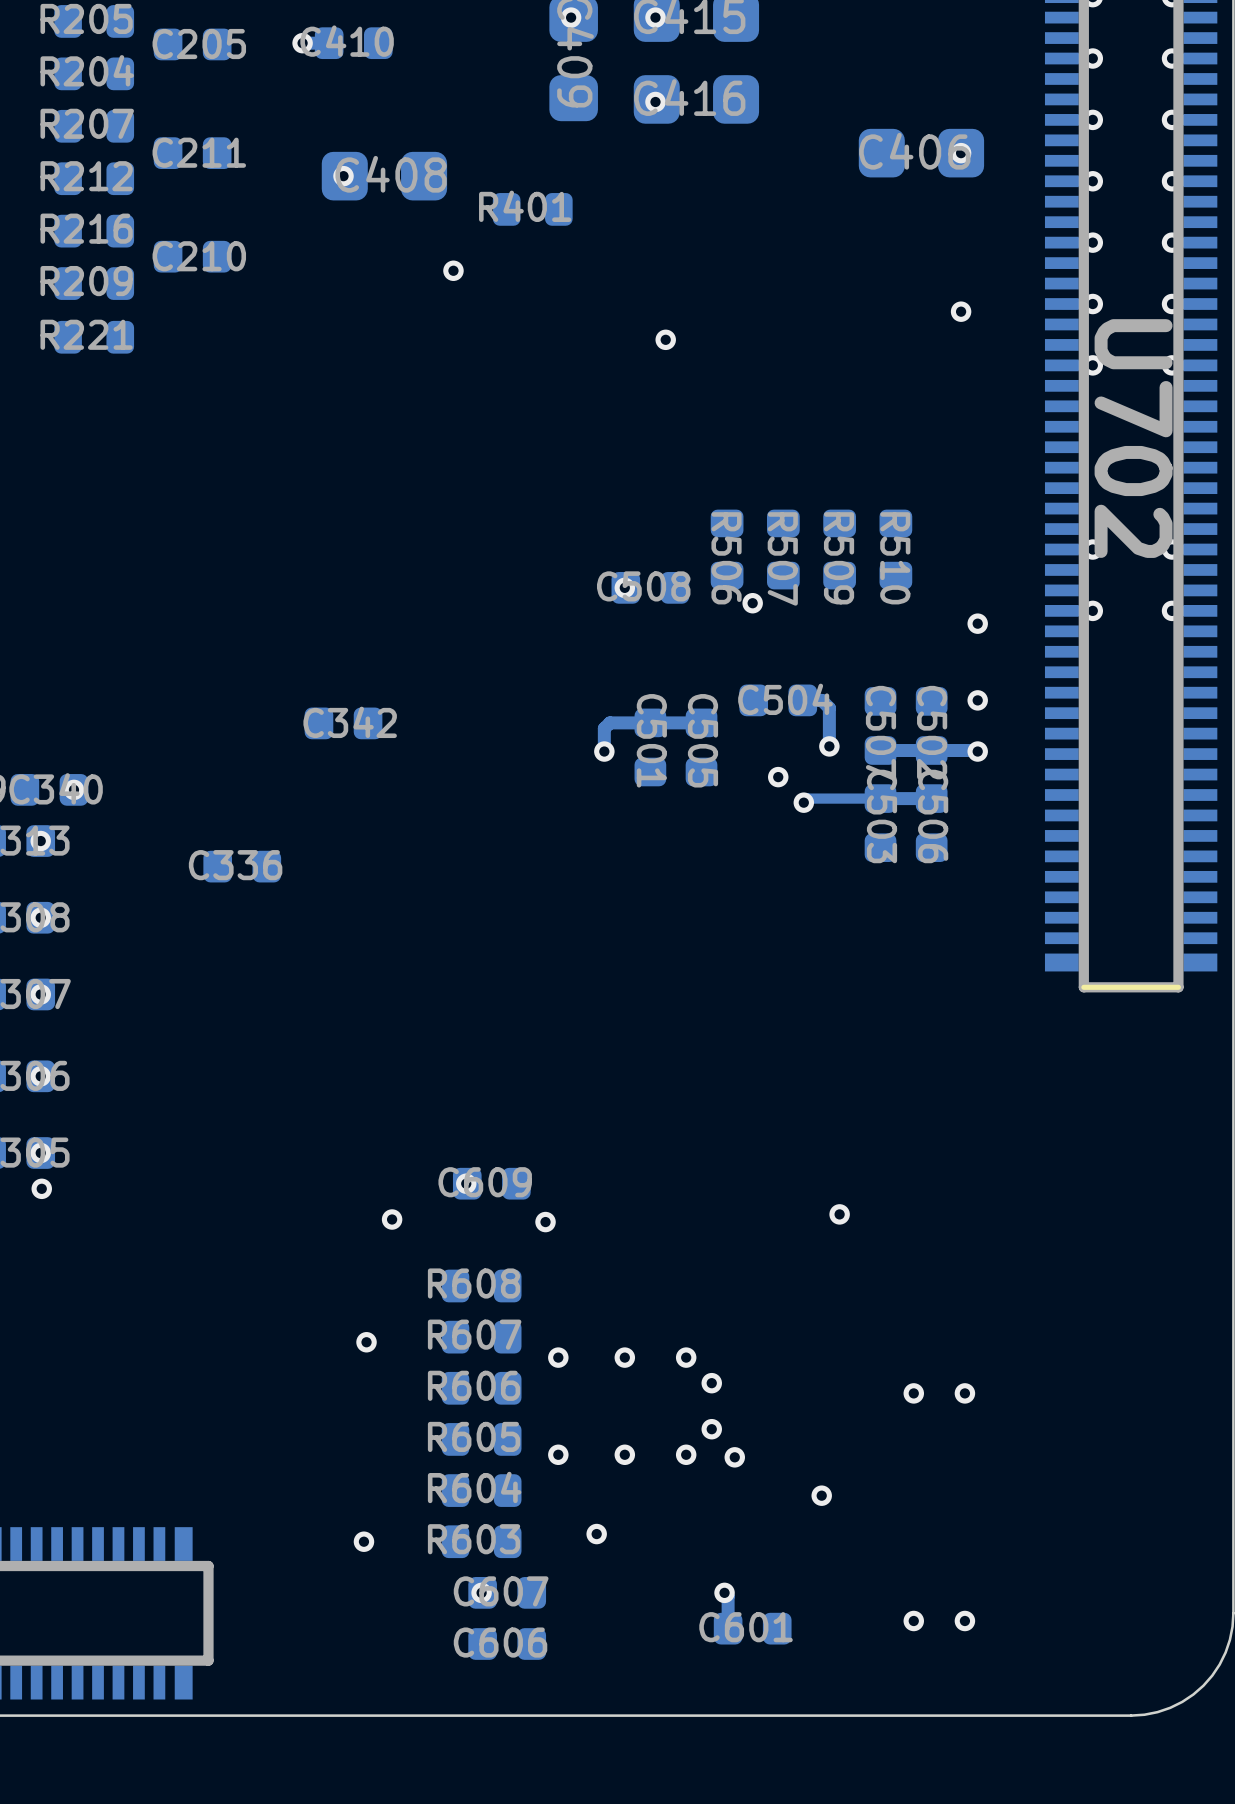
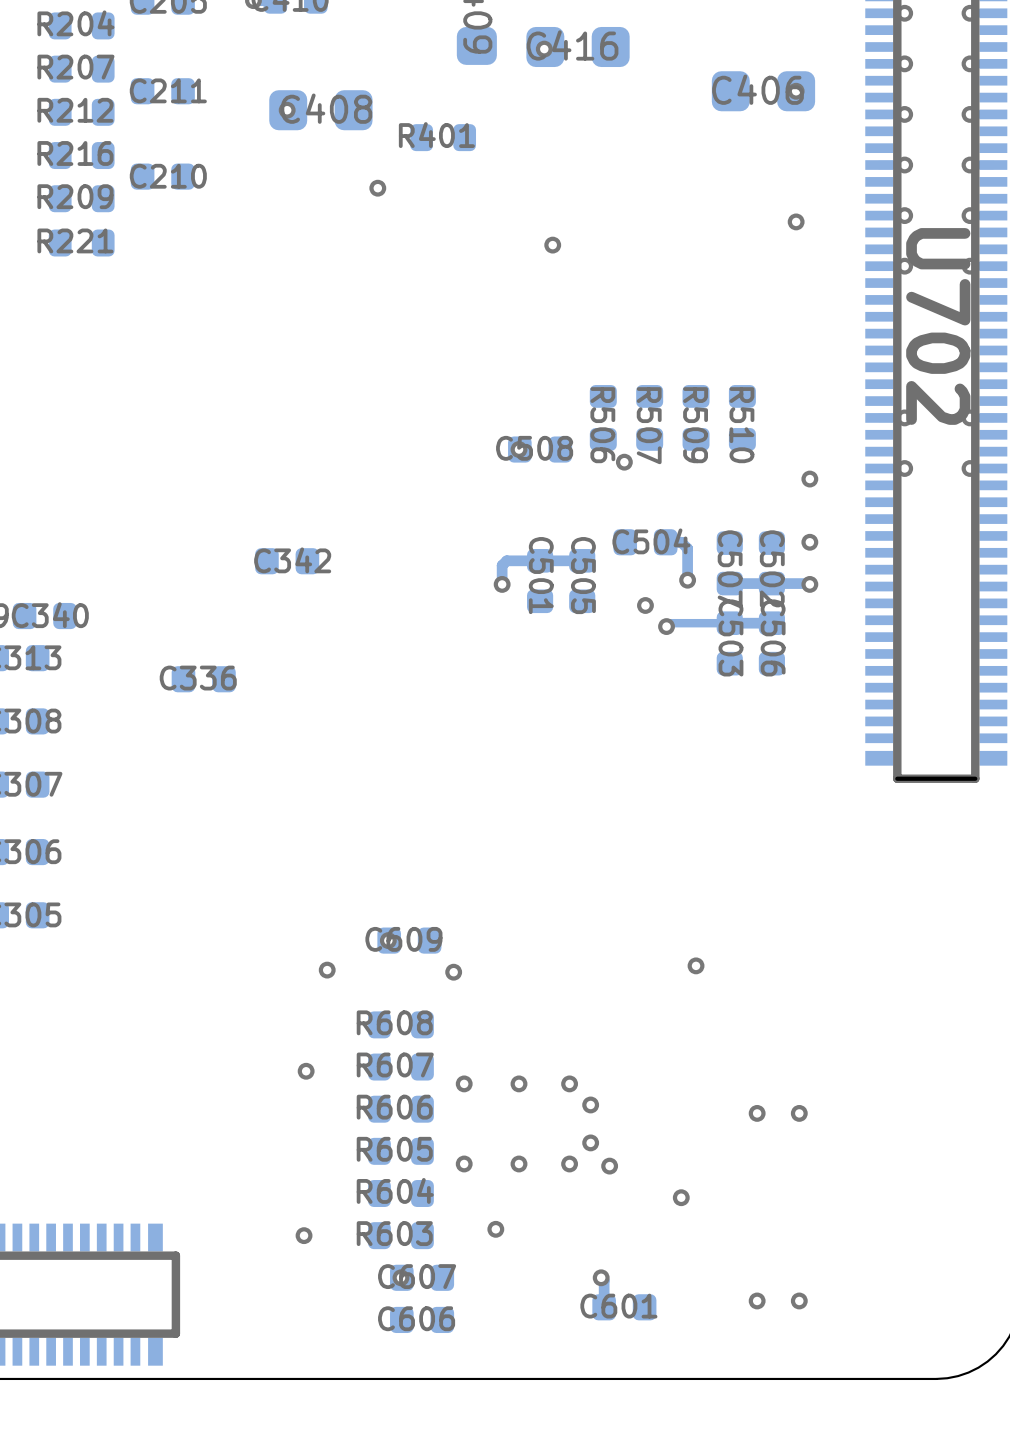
via: (73, 789) -> none
via: (40, 841) -> none
via: (40, 917) -> none
via: (40, 994) -> none
via: (40, 1076) -> none
via: (40, 1153) -> none
via: (41, 1188) -> none

